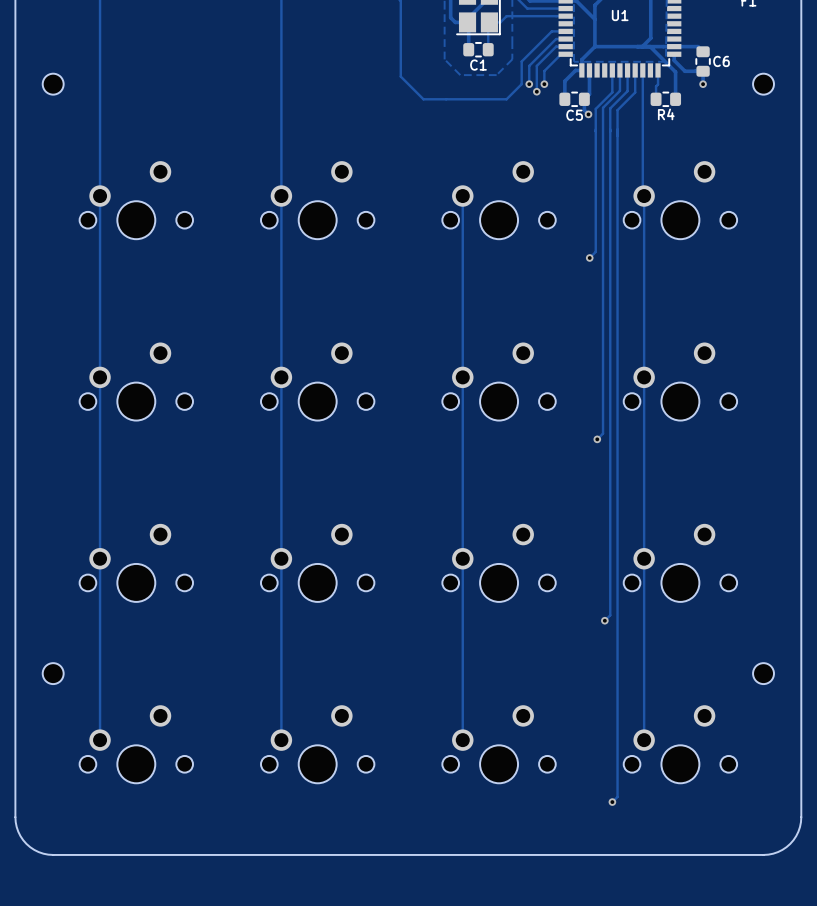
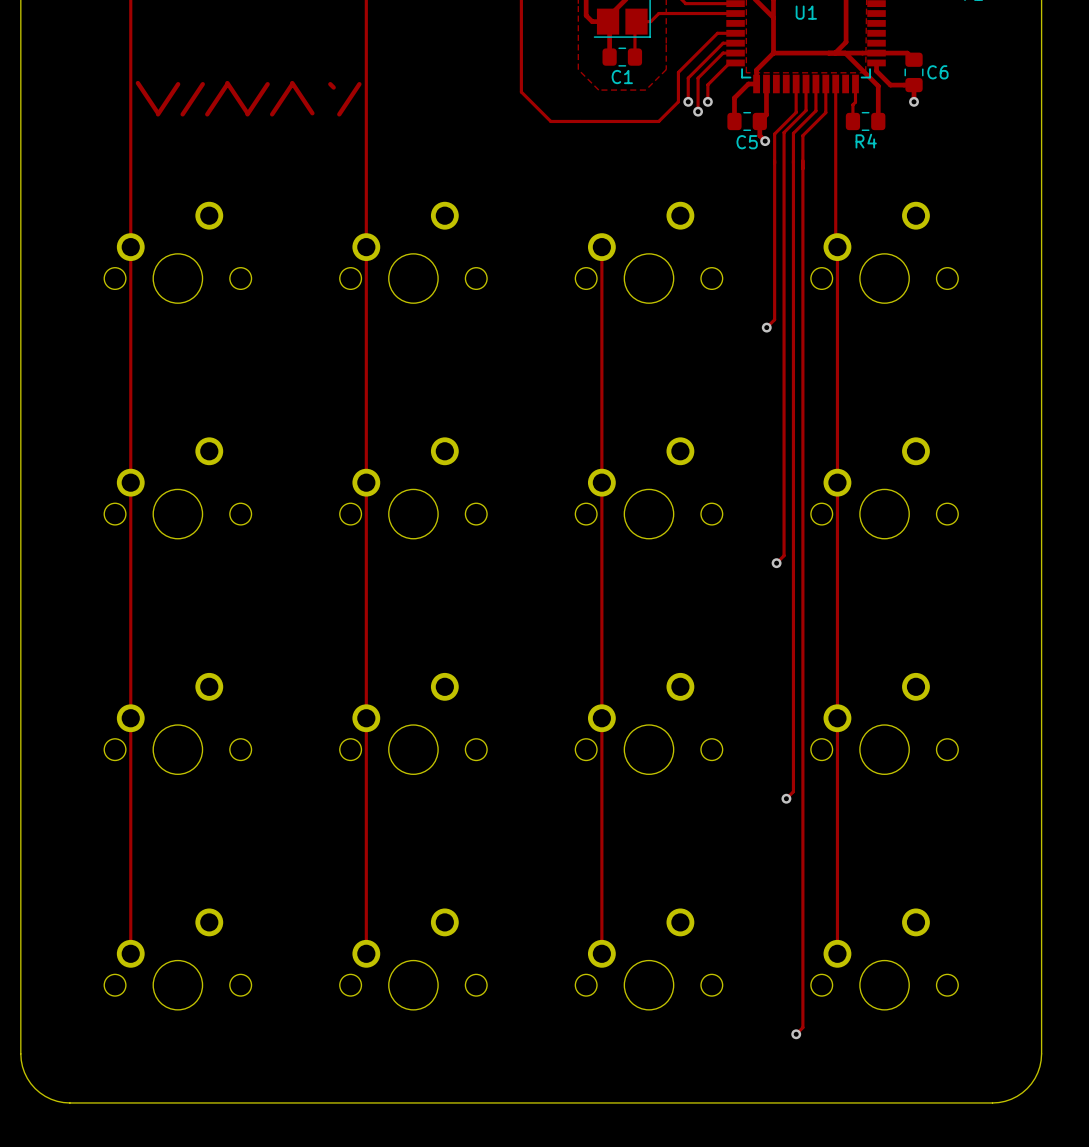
text: none -> \///\//\ `/ (248, 98)
part: (53, 84) -> none
part: (763, 84) -> none
part: (53, 673) -> none
part: (763, 673) -> none

